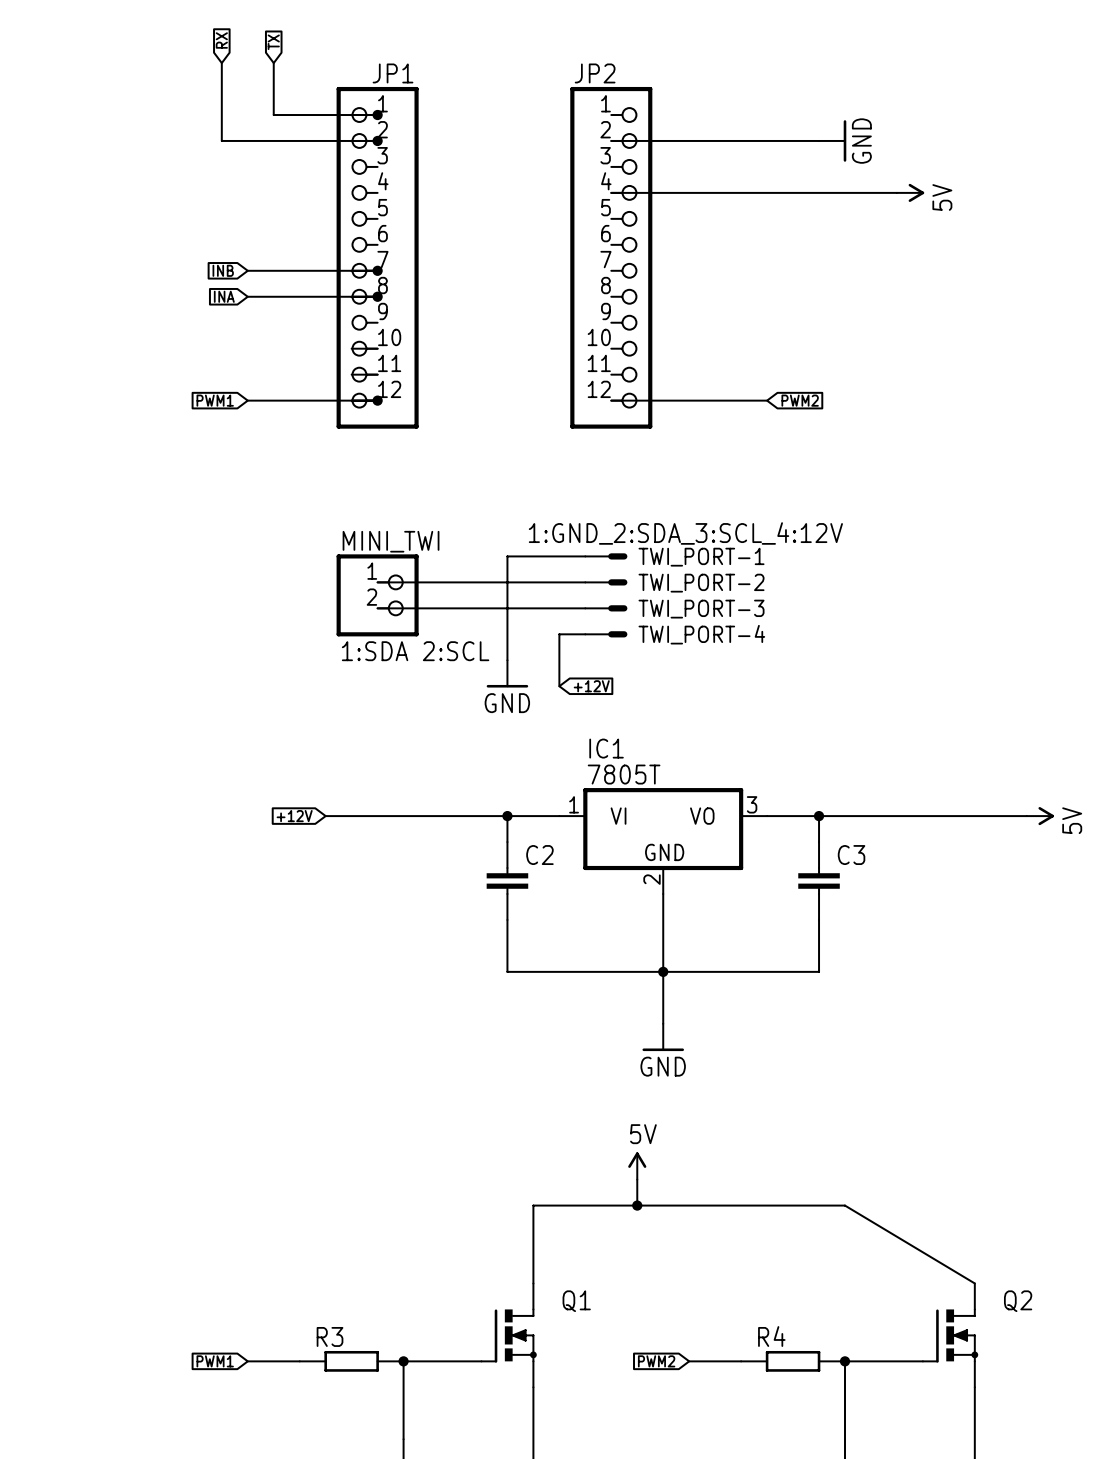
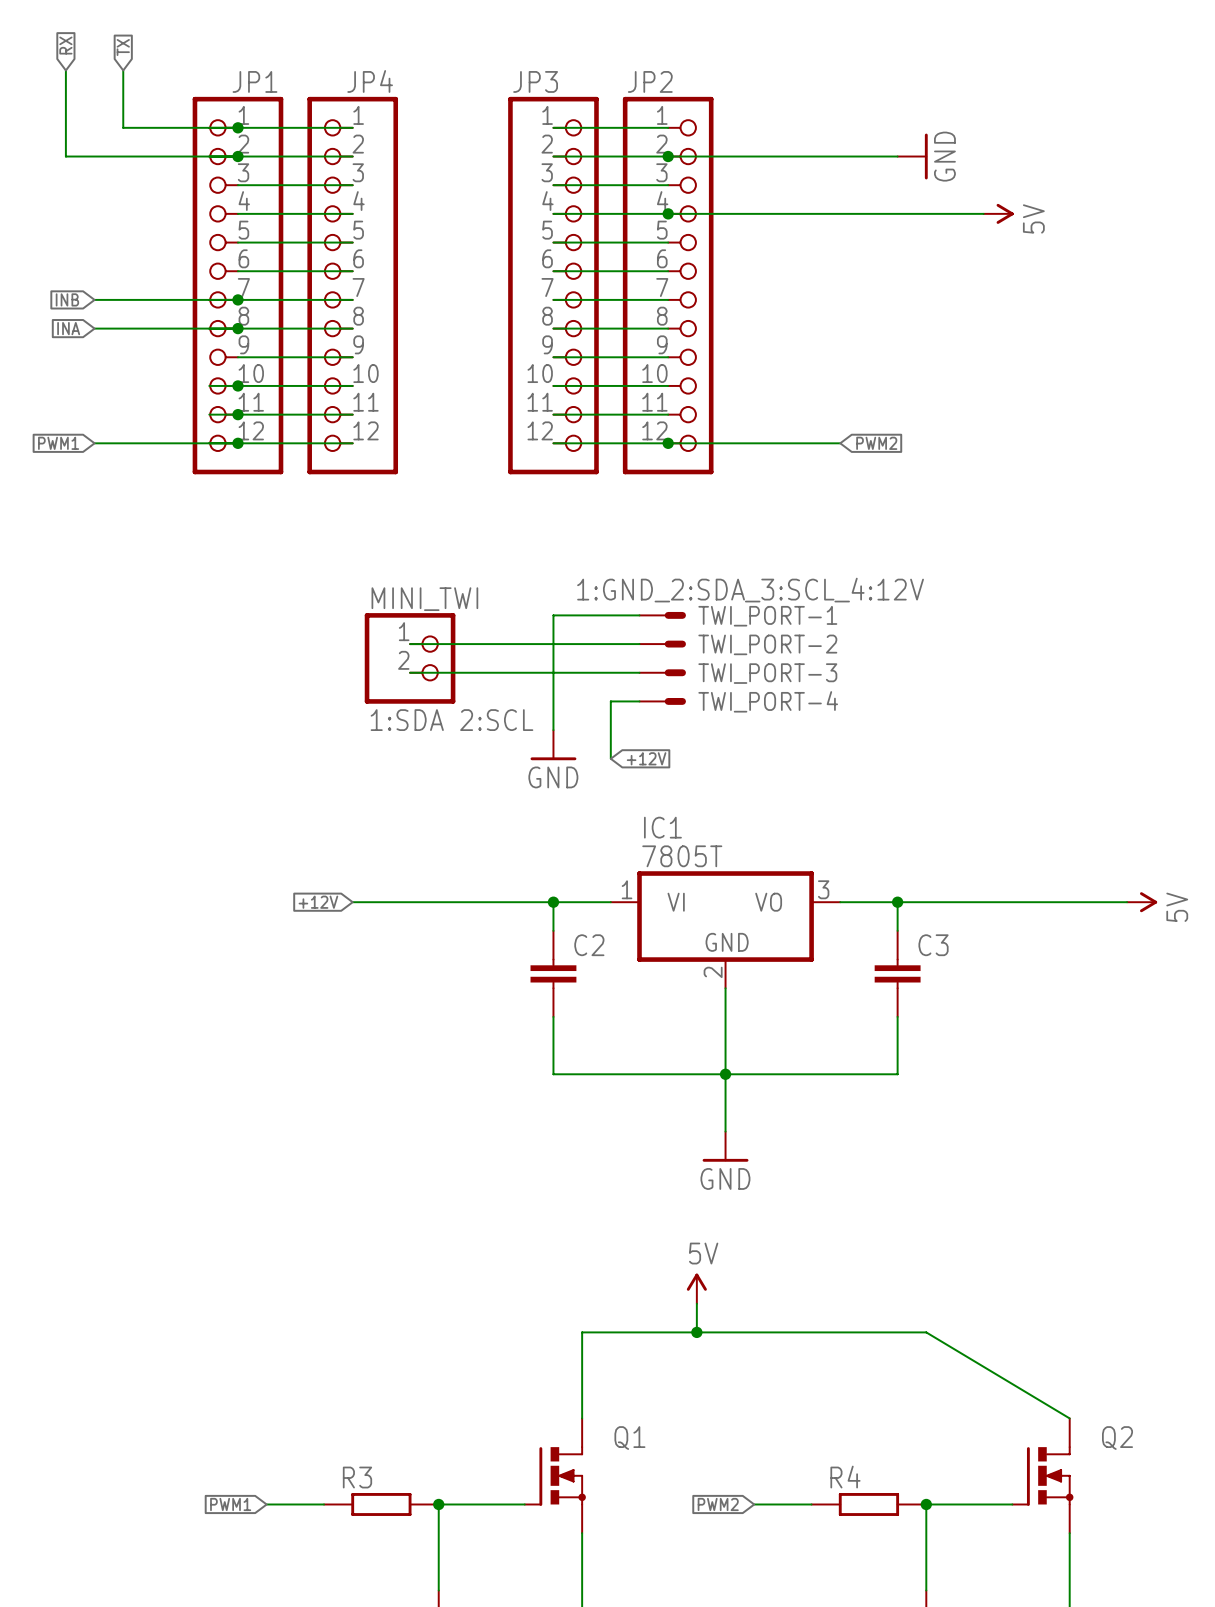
global label position: RX (221, 40) -> RX (65, 45)
global label position: TX (273, 42) -> TX (123, 47)
wire: (221, 63) (221, 140) -> (65, 70) (65, 156) (237, 156)
wire: (273, 63) (273, 115) -> (123, 70) (123, 127) (295, 127)
junction: none -> (237, 127)
wire: (325, 115) (377, 115) -> none
junction: (377, 115) -> none
wire: none -> (553, 127) (668, 127)
junction: none -> (237, 156)
wire: (325, 140) (377, 140) -> none
junction: (377, 140) -> none
wire: none -> (553, 156) (668, 156)
junction: none -> (668, 156)
wire: none -> (237, 185) (352, 185)
wire: none -> (553, 185) (668, 185)
wire: none -> (237, 213) (352, 213)
wire: none -> (553, 213) (668, 213)
junction: none -> (668, 213)
wire: none -> (237, 242) (352, 242)
wire: none -> (553, 242) (668, 242)
wire: none -> (237, 271) (352, 271)
wire: none -> (553, 271) (668, 271)
JP4: none -> (352, 285)
JP1 position: (377, 257) -> (237, 285)
JP3: none -> (553, 285)
wire: none -> (94, 299) (266, 299)
junction: none -> (237, 299)
global label position: INB (223, 270) -> INB (67, 299)
wire: (325, 270) (377, 270) -> none
junction: (377, 270) -> none
wire: none -> (553, 299) (668, 299)
wire: none -> (94, 328) (266, 328)
junction: none -> (237, 328)
global label position: INA (224, 296) -> INA (68, 328)
wire: (325, 296) (377, 296) -> none
junction: (377, 296) -> none
wire: none -> (553, 328) (668, 328)
wire: none -> (237, 357) (352, 357)
wire: none -> (553, 357) (668, 357)
wire: none -> (209, 385) (352, 385)
junction: none -> (237, 385)
wire: (351, 348) (377, 348) -> none
wire: none -> (553, 385) (668, 385)
wire: none -> (209, 414) (352, 414)
junction: none -> (237, 414)
wire: (351, 374) (377, 374) -> none
wire: none -> (553, 414) (668, 414)
wire: none -> (94, 443) (266, 443)
global label position: PWM1 (215, 400) -> PWM1 (58, 443)
junction: none -> (237, 443)
wire: (325, 400) (377, 400) -> none
junction: (377, 400) -> none
wire: none -> (553, 443) (668, 443)
junction: none -> (668, 443)

